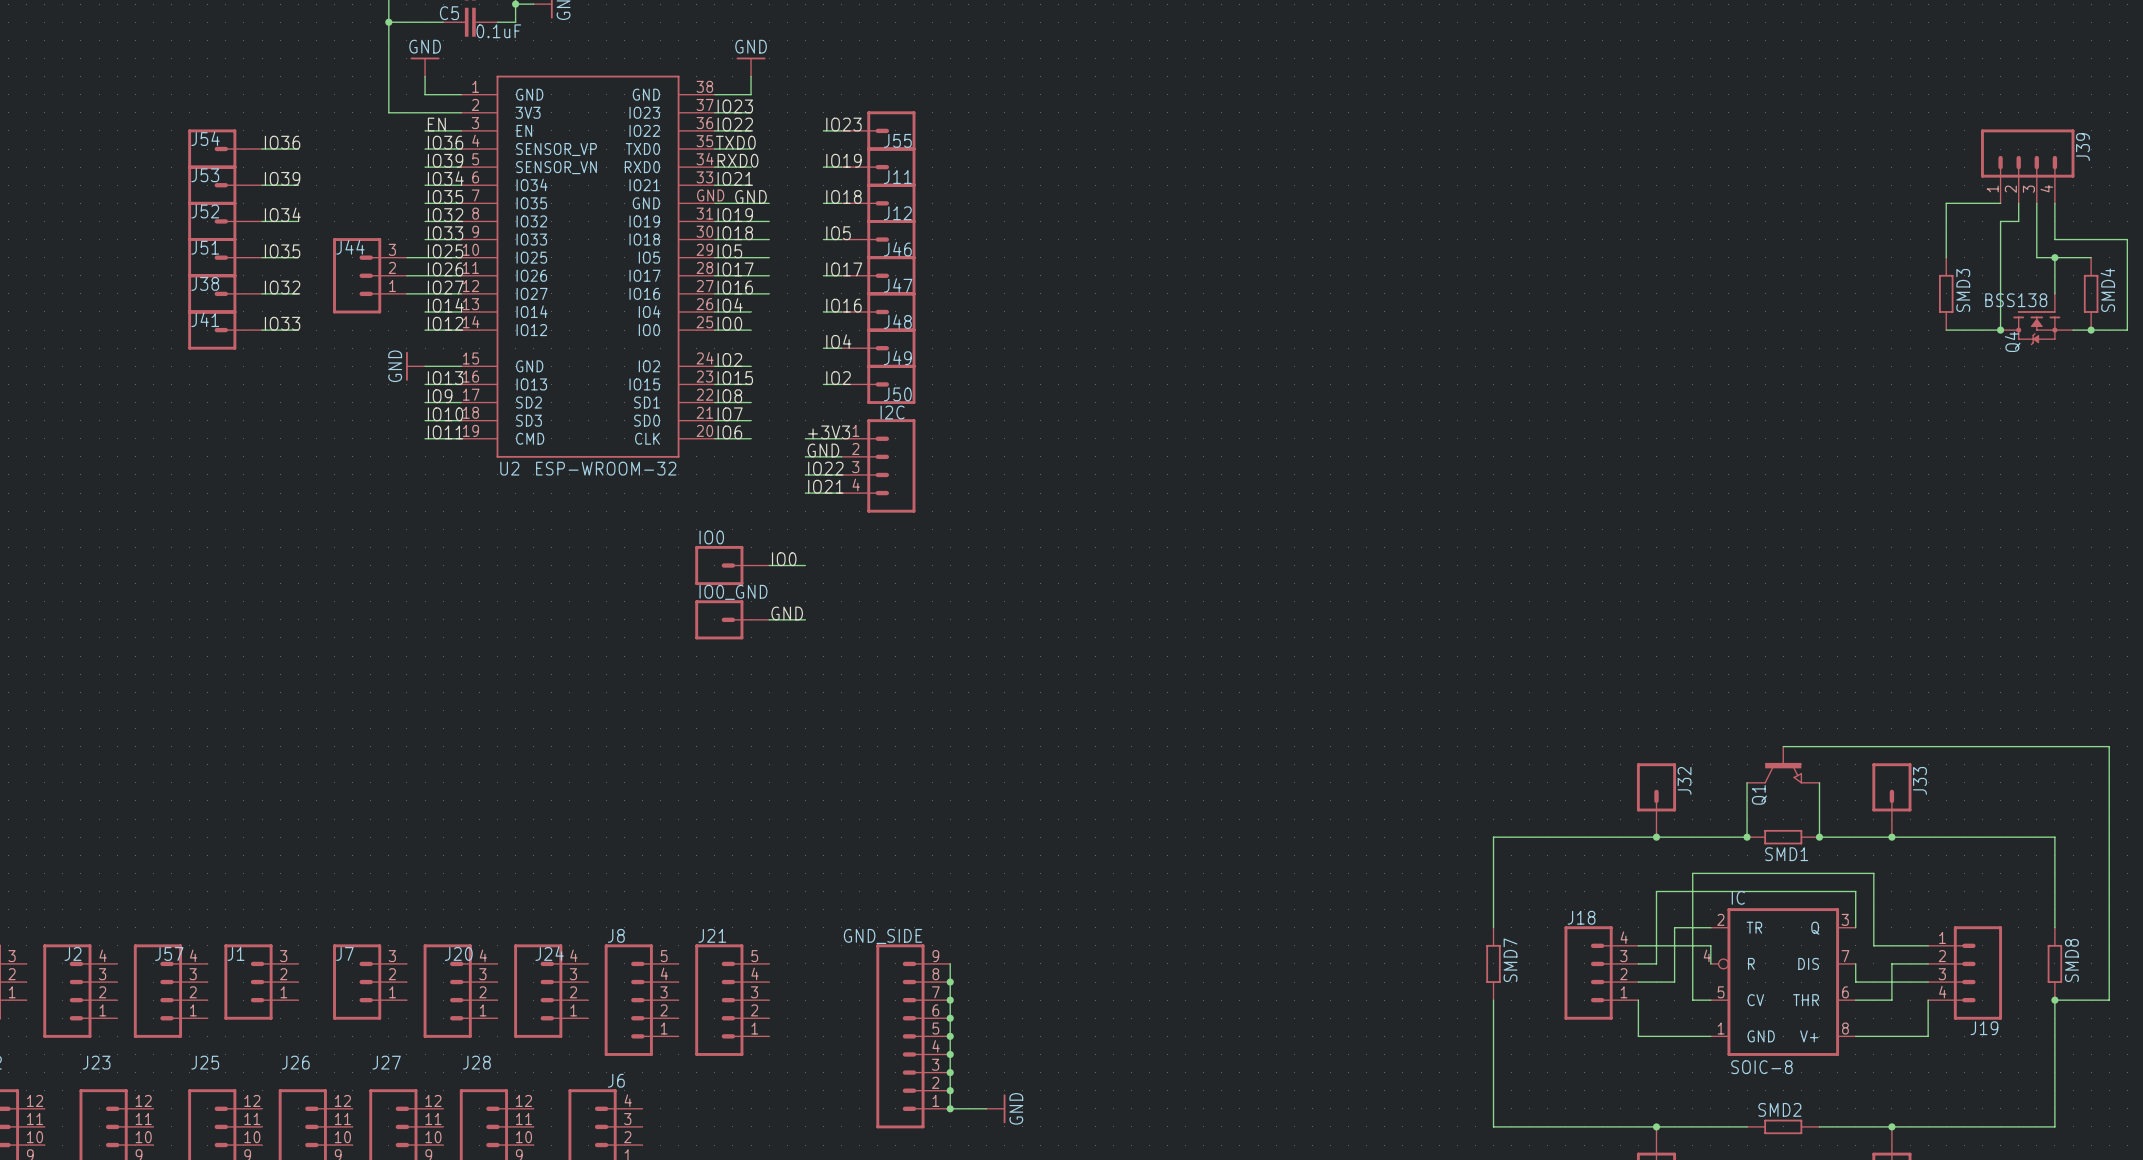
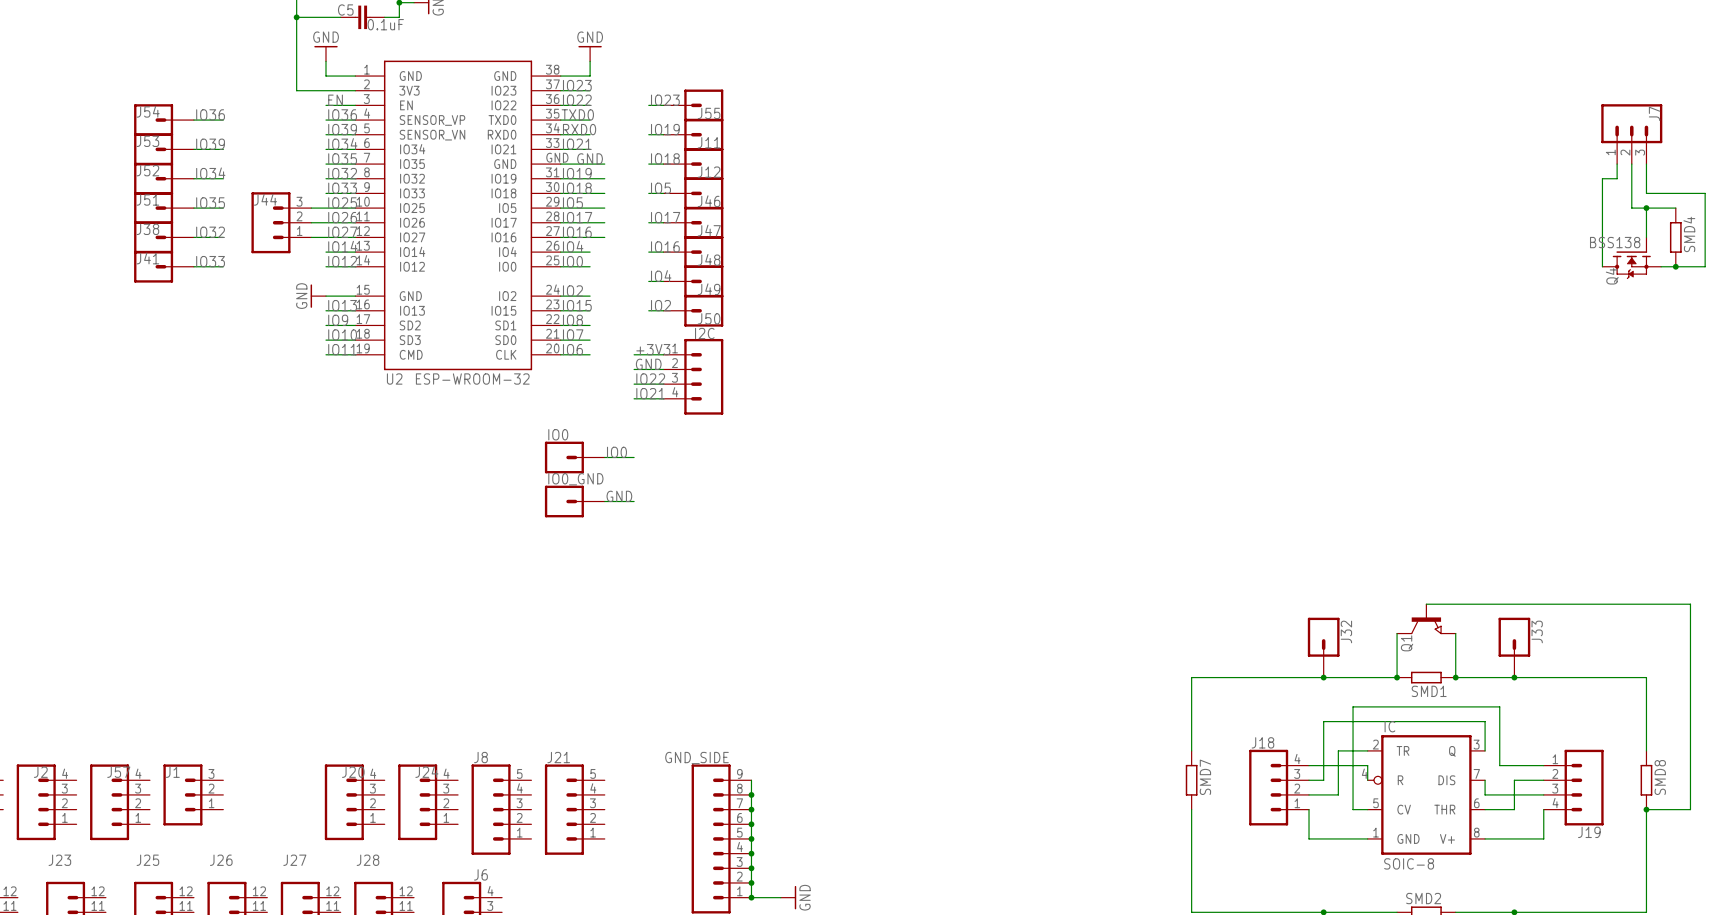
J39: (2027, 166) -> none
wire: (2000, 203) (1946, 203) (1946, 257) -> none
SMD3: (1946, 293) -> none
wire: (1946, 330) (2000, 330) -> none
junction: (2000, 330) -> none
J7 rotation: 0° (357, 982) -> 90° clockwise (1631, 123)
J7 position: (369, 982) -> (1631, 134)

